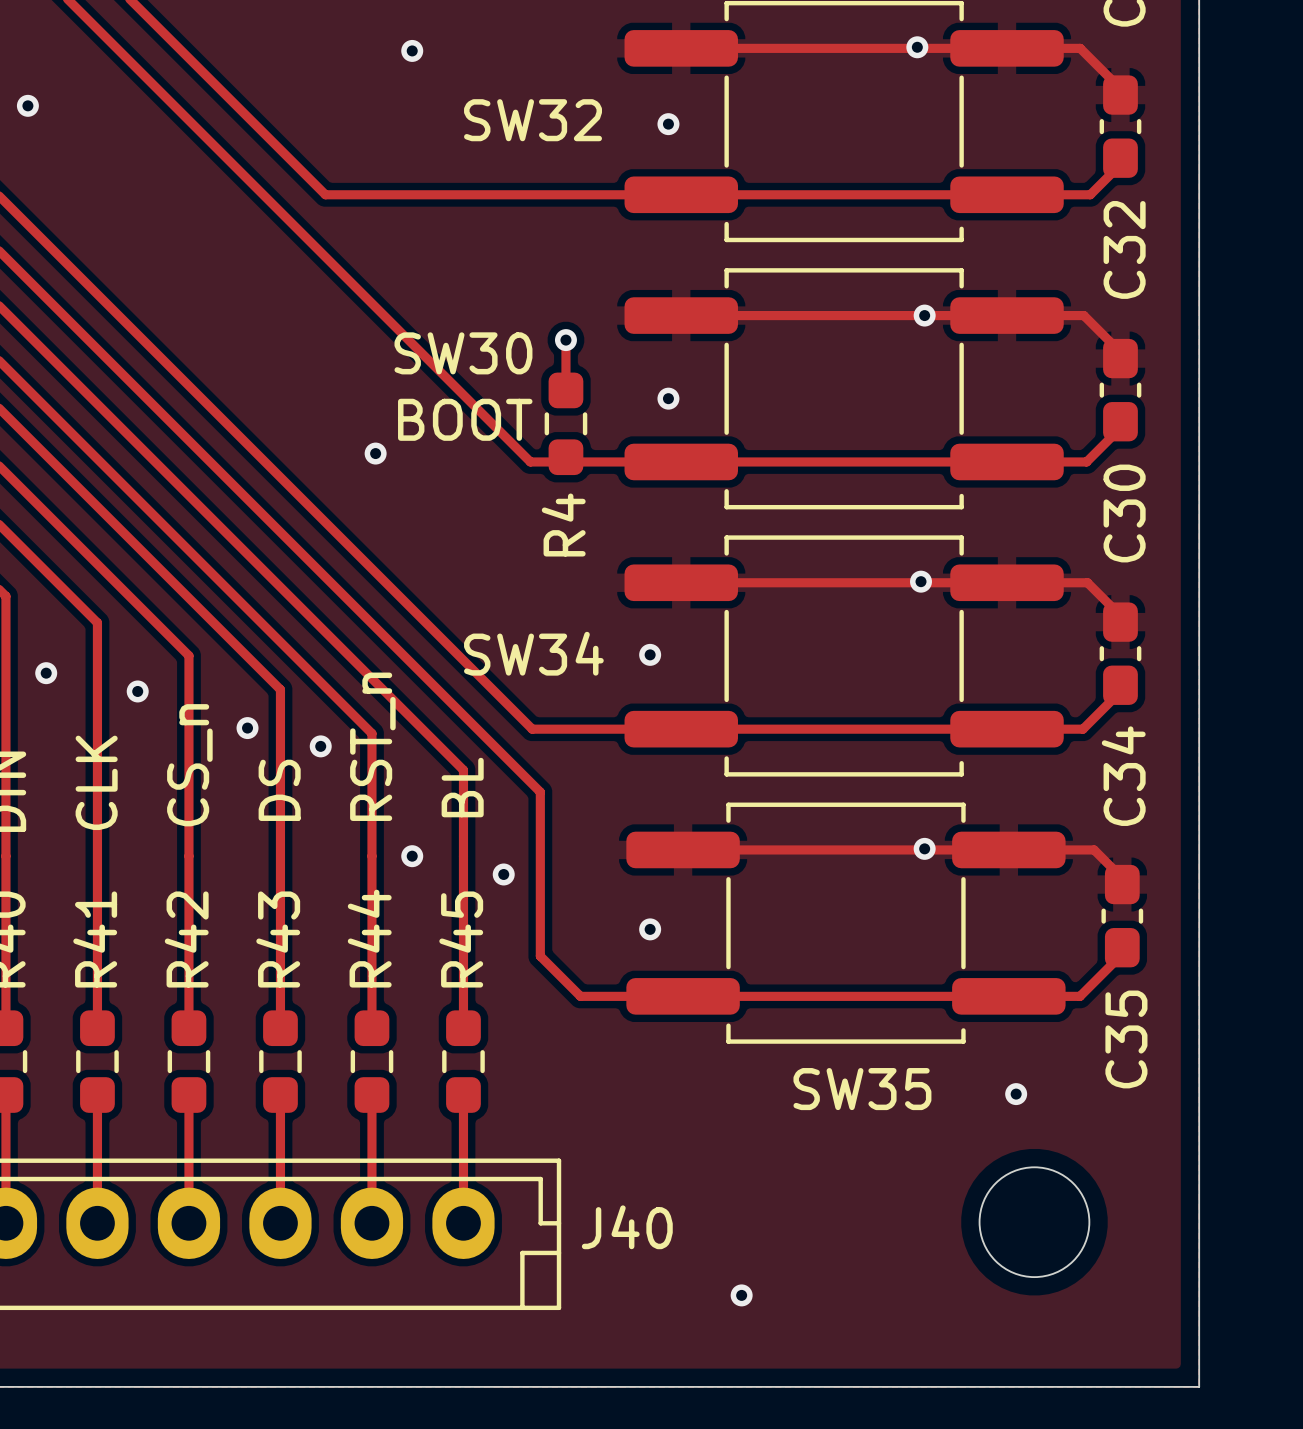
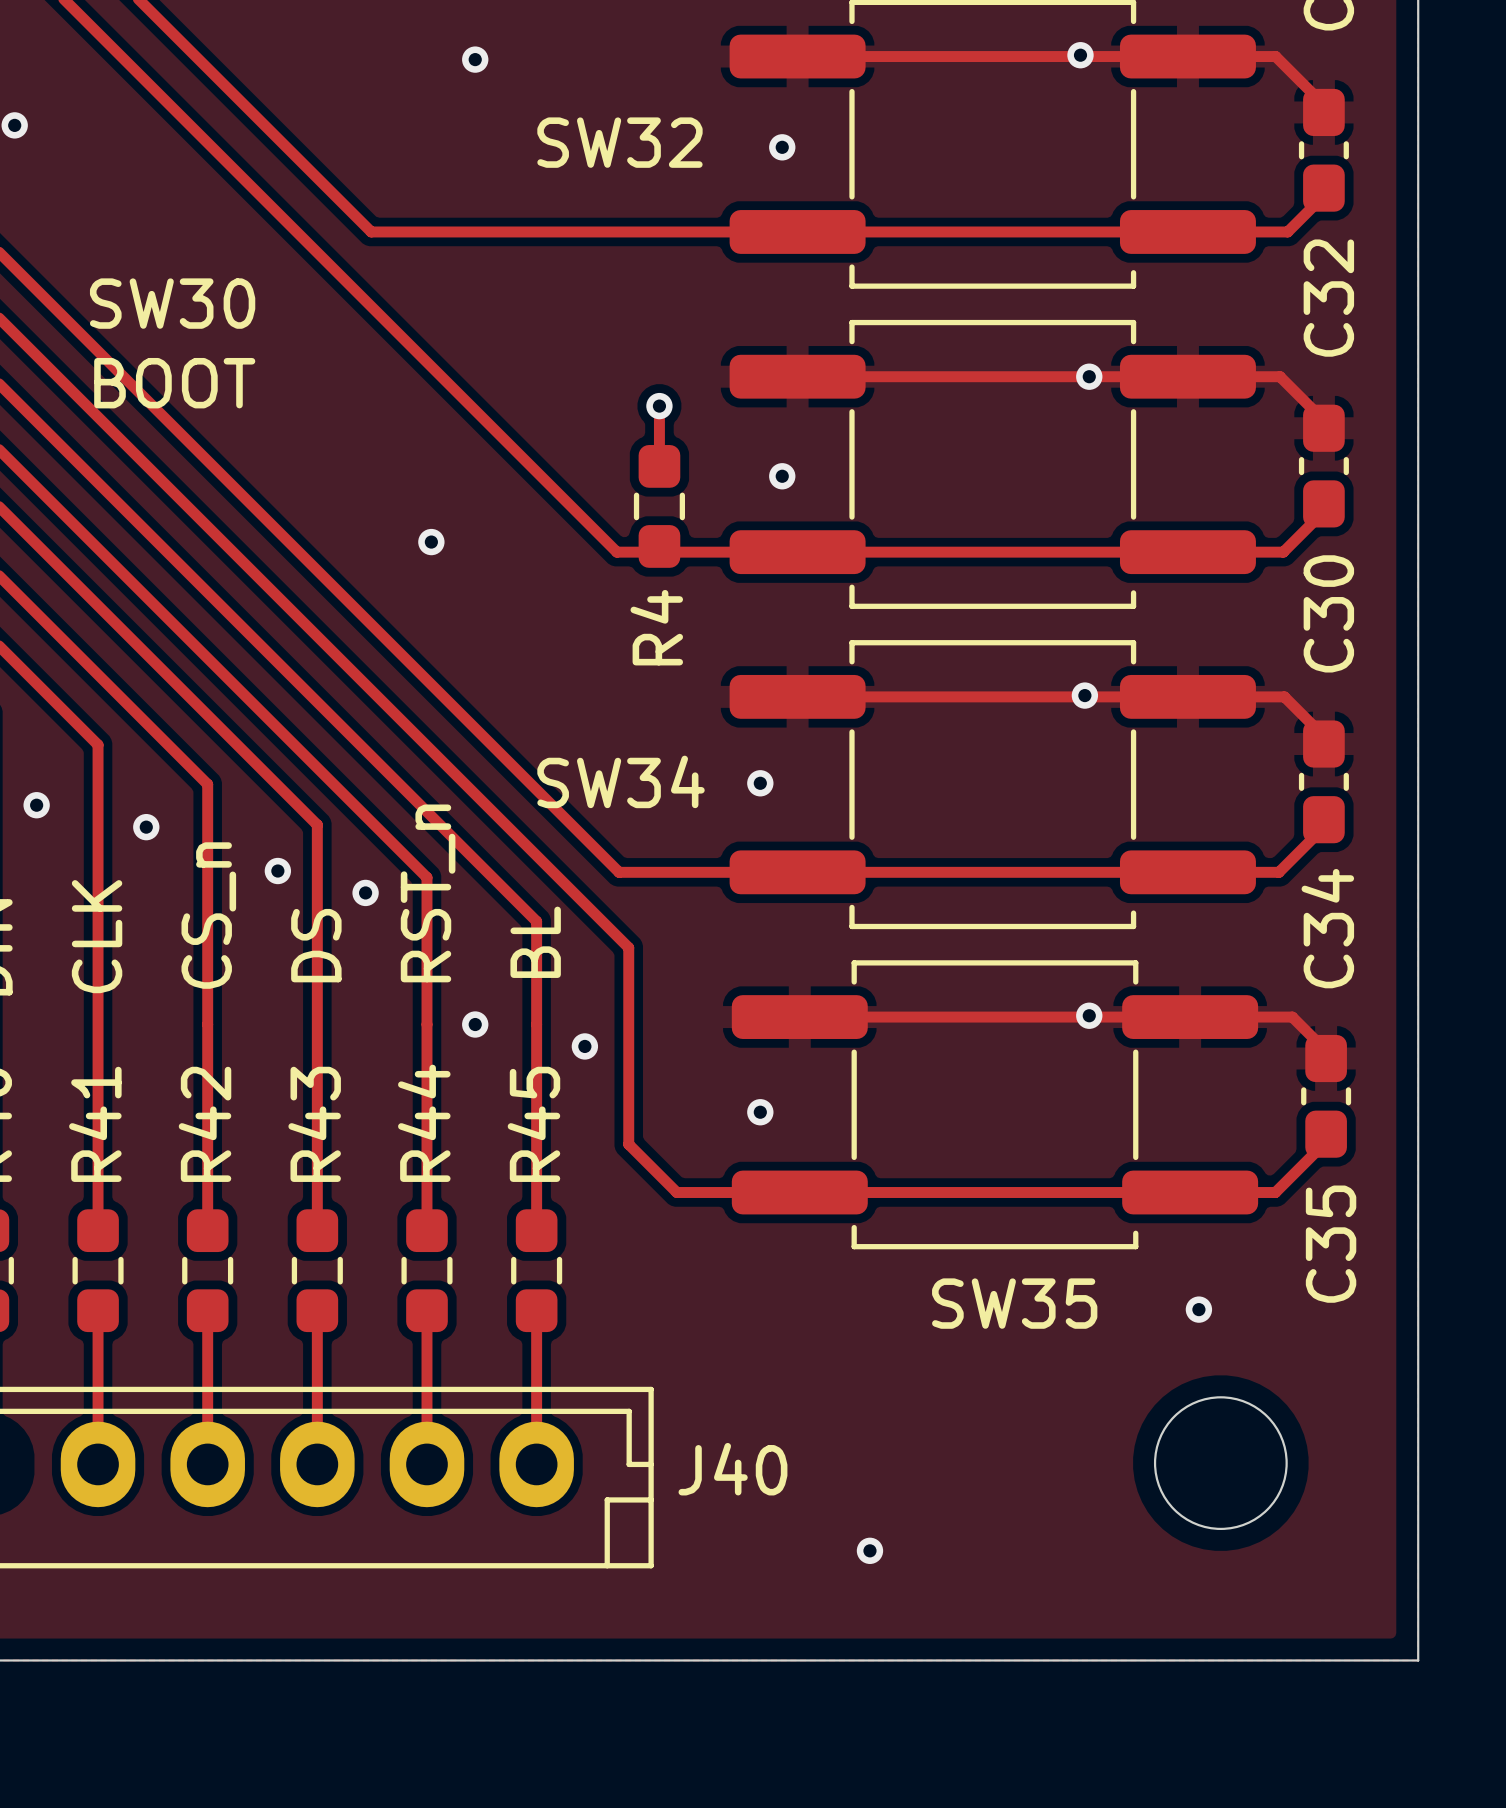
SW30 name position: SW30 (463, 353) -> SW30 (172, 303)
text position: BOOT (465, 419) -> BOOT (174, 383)

